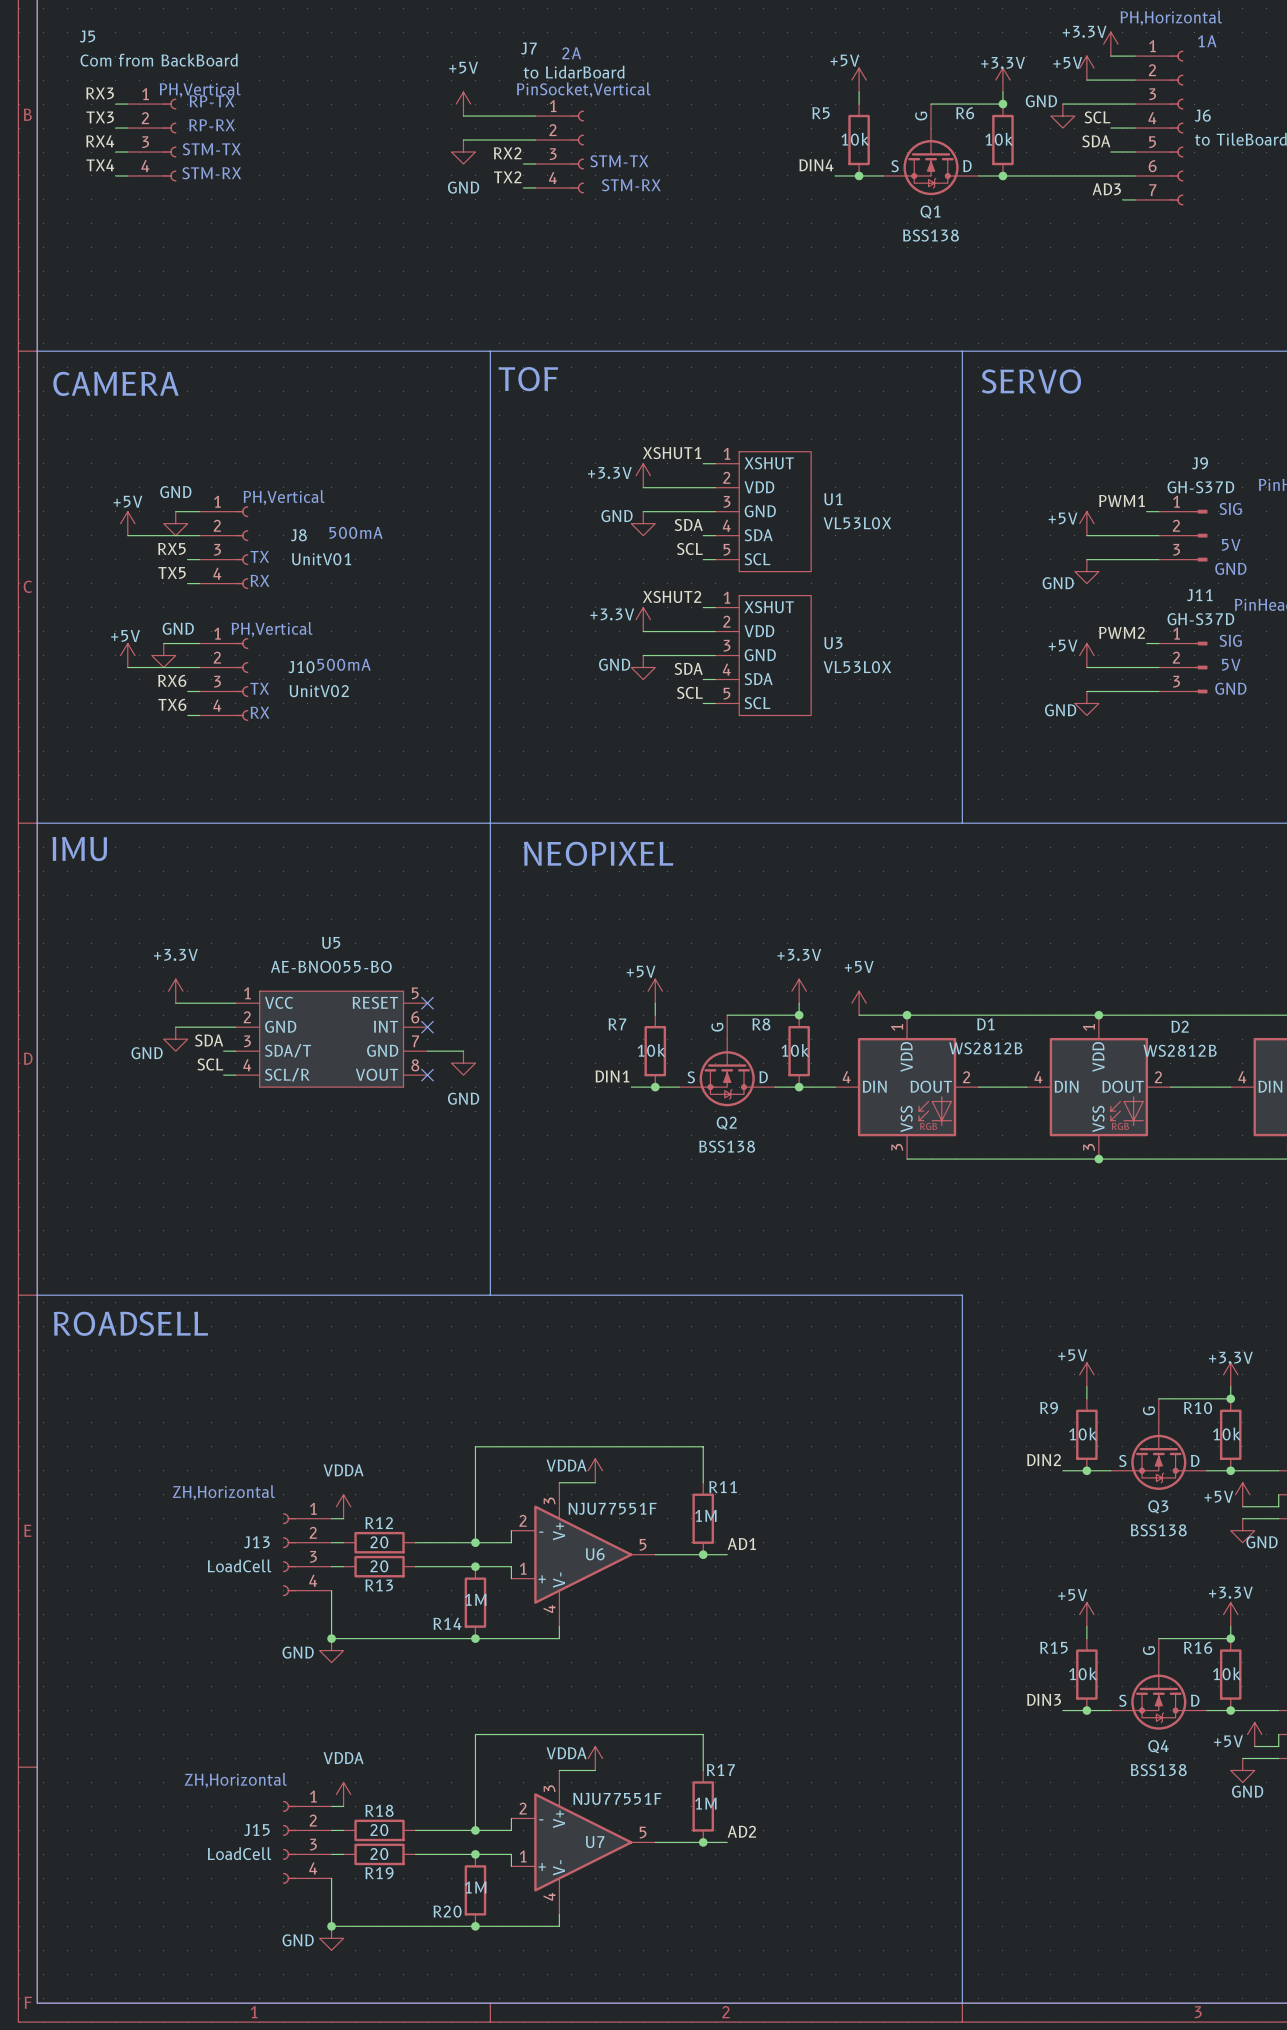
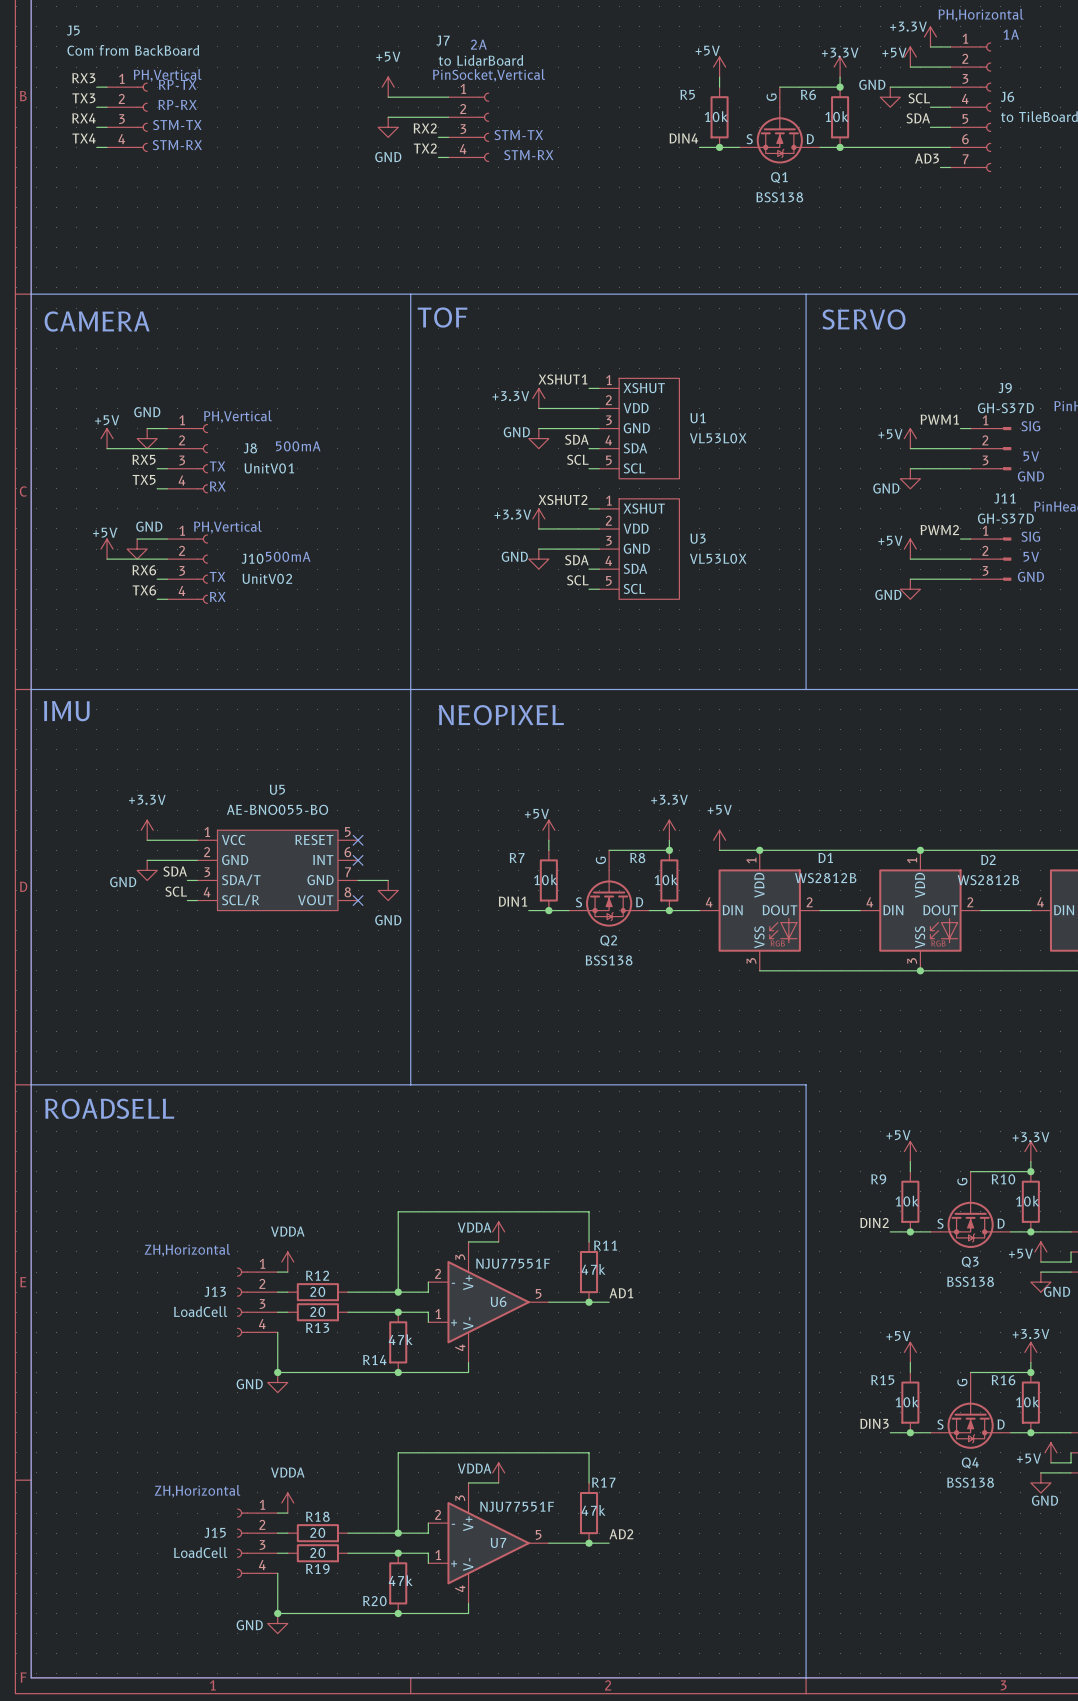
R11 value: 1M (705, 1515) -> 47k (593, 1269)
R14 value: 1M (475, 1599) -> 47k (400, 1339)
R17 value: 1M (705, 1803) -> 47k (593, 1510)
R20 value: 1M (475, 1887) -> 47k (400, 1580)

